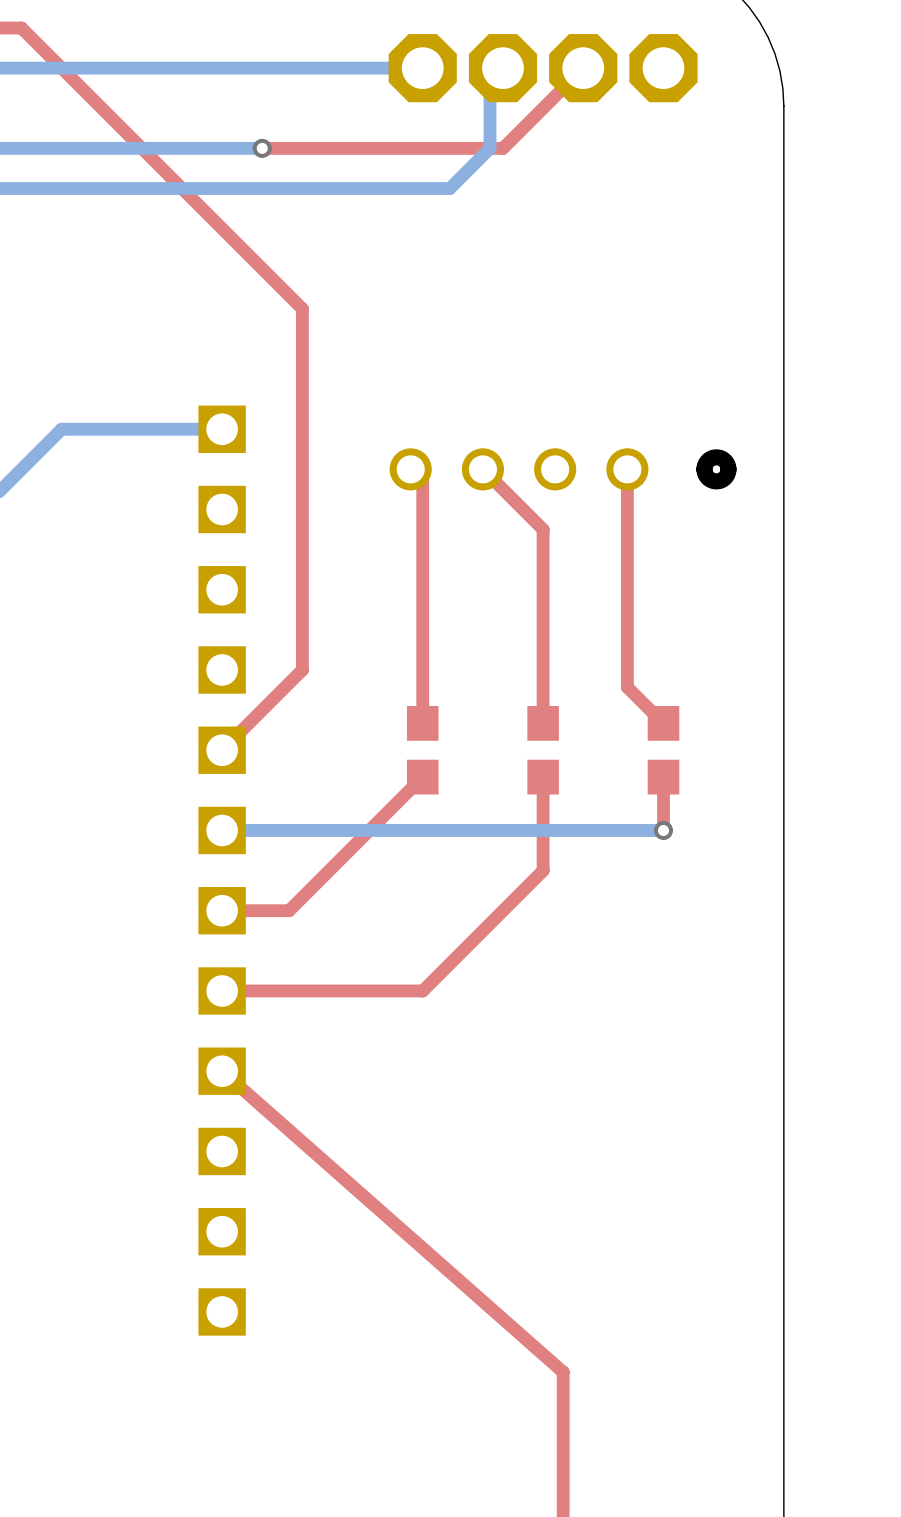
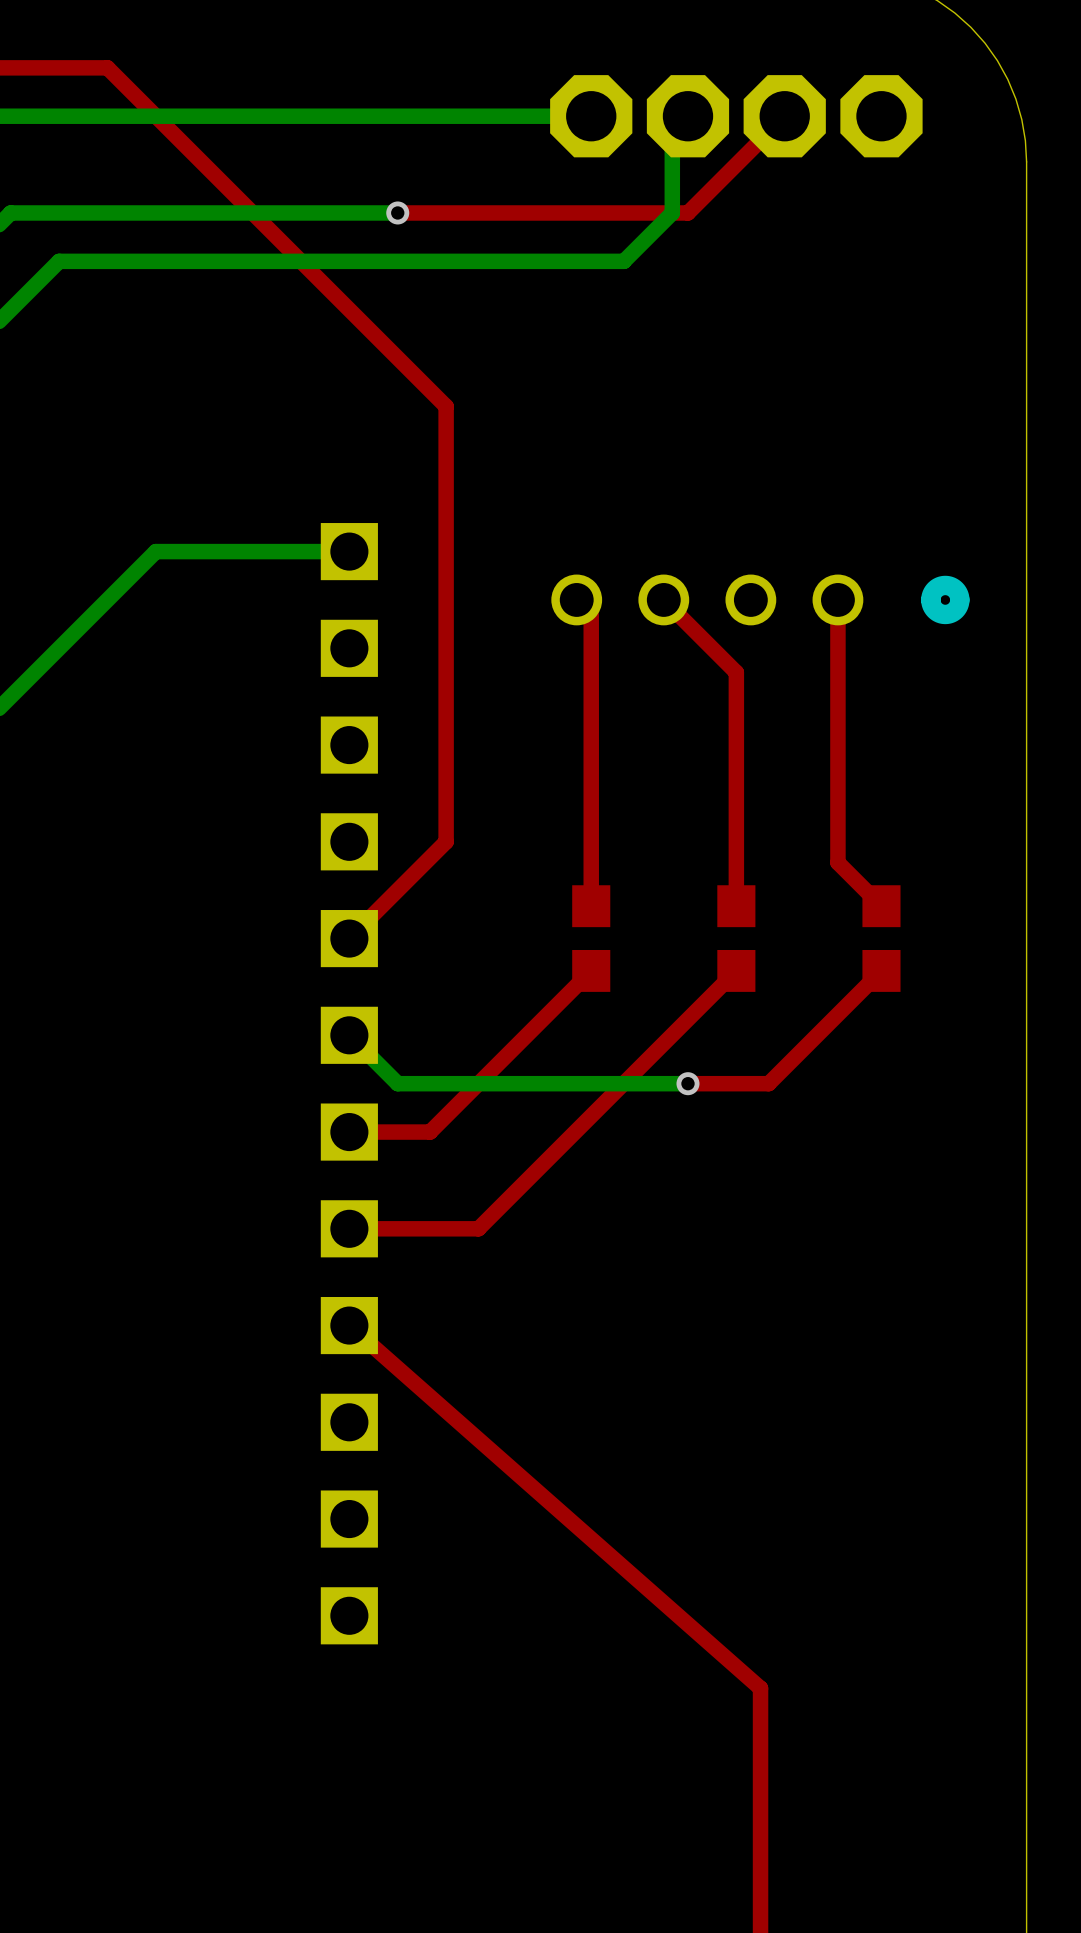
top track: (543, 777) (543, 870) (422, 990) (329, 990) -> (736, 970) (478, 1228)
top track: (663, 777) (663, 830) -> (881, 970) (768, 1083) (687, 1083)
bottom track: (663, 830) (222, 830) -> (687, 1083) (397, 1083) (349, 1035)
via position: (663, 830) -> (687, 1083)

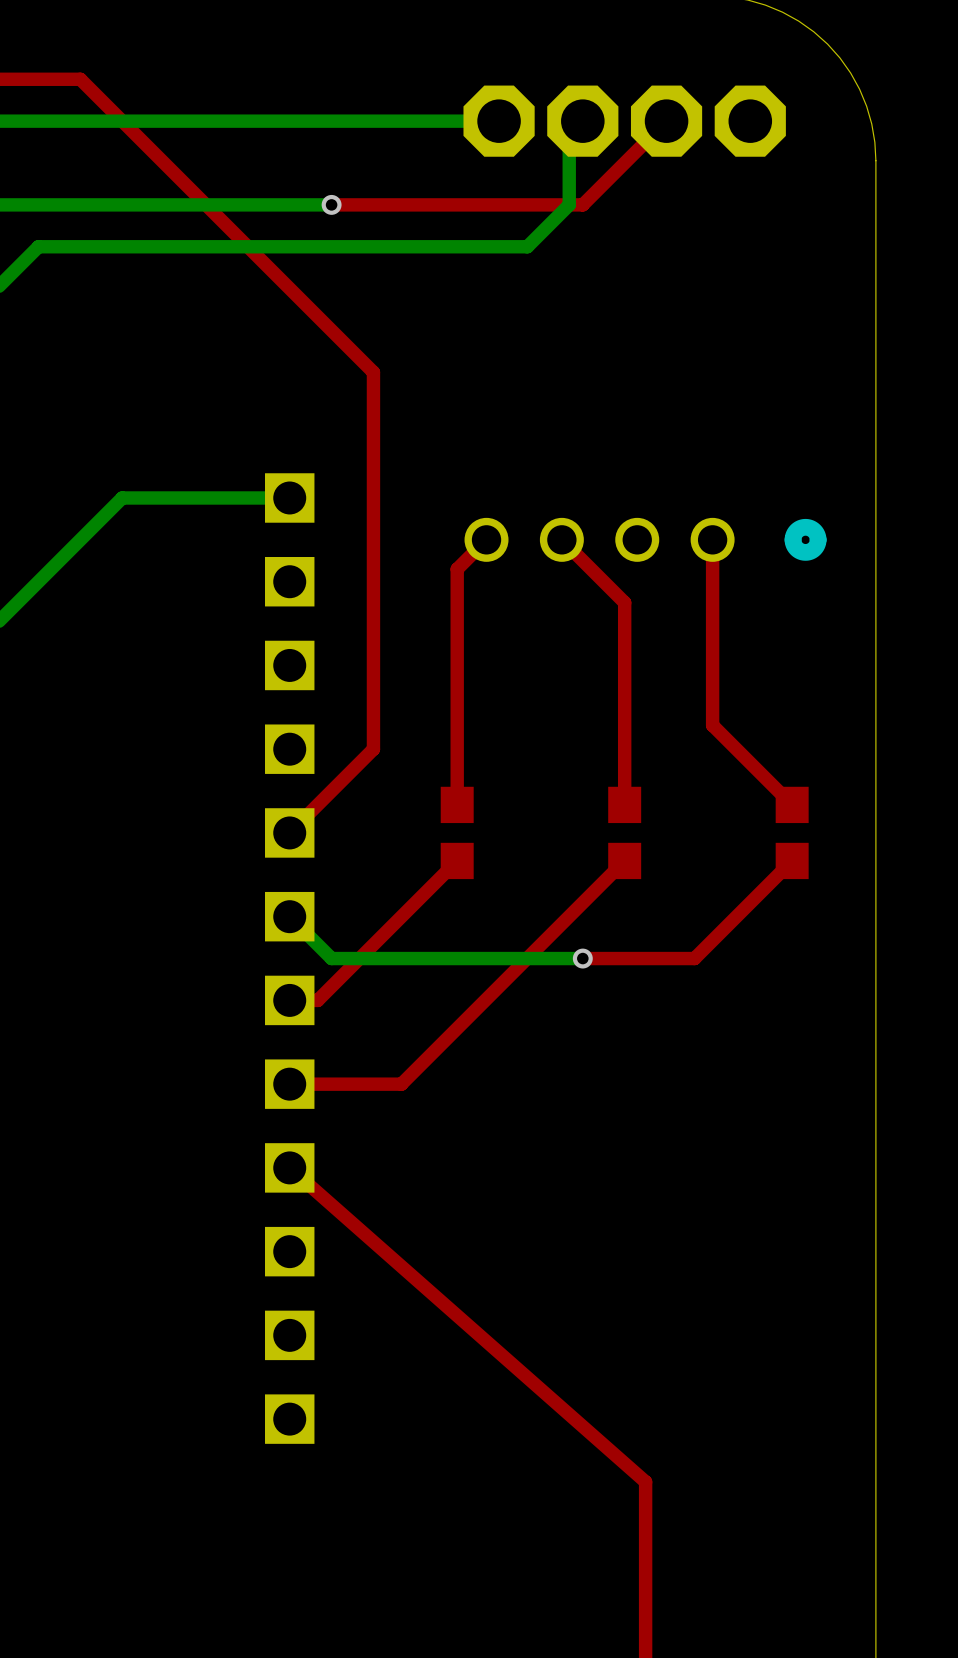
top track: (576, 599) (591, 614) (591, 906) -> (486, 539) (457, 569) (457, 804)
top track: (837, 814) (837, 862) (881, 906) -> (712, 725) (792, 804)
part position: (591, 938) -> (457, 832)
part position: (881, 938) -> (792, 832)
top track: (591, 970) (430, 1132) (381, 1132) -> (457, 860) (317, 1000)
top track: (881, 970) (768, 1083) -> (792, 860) (694, 958) (652, 958)

